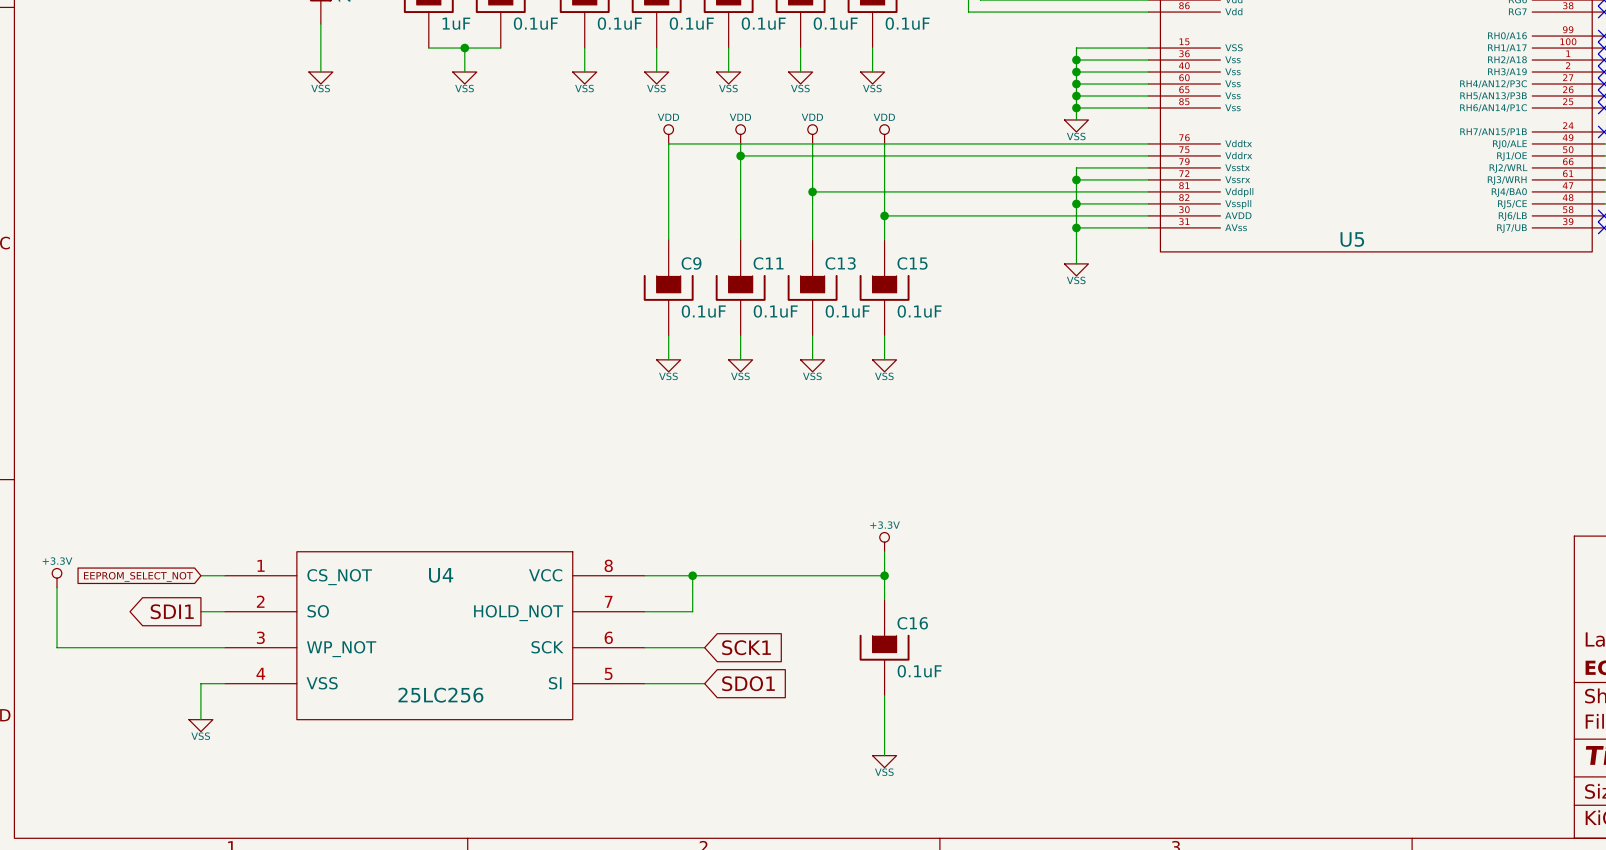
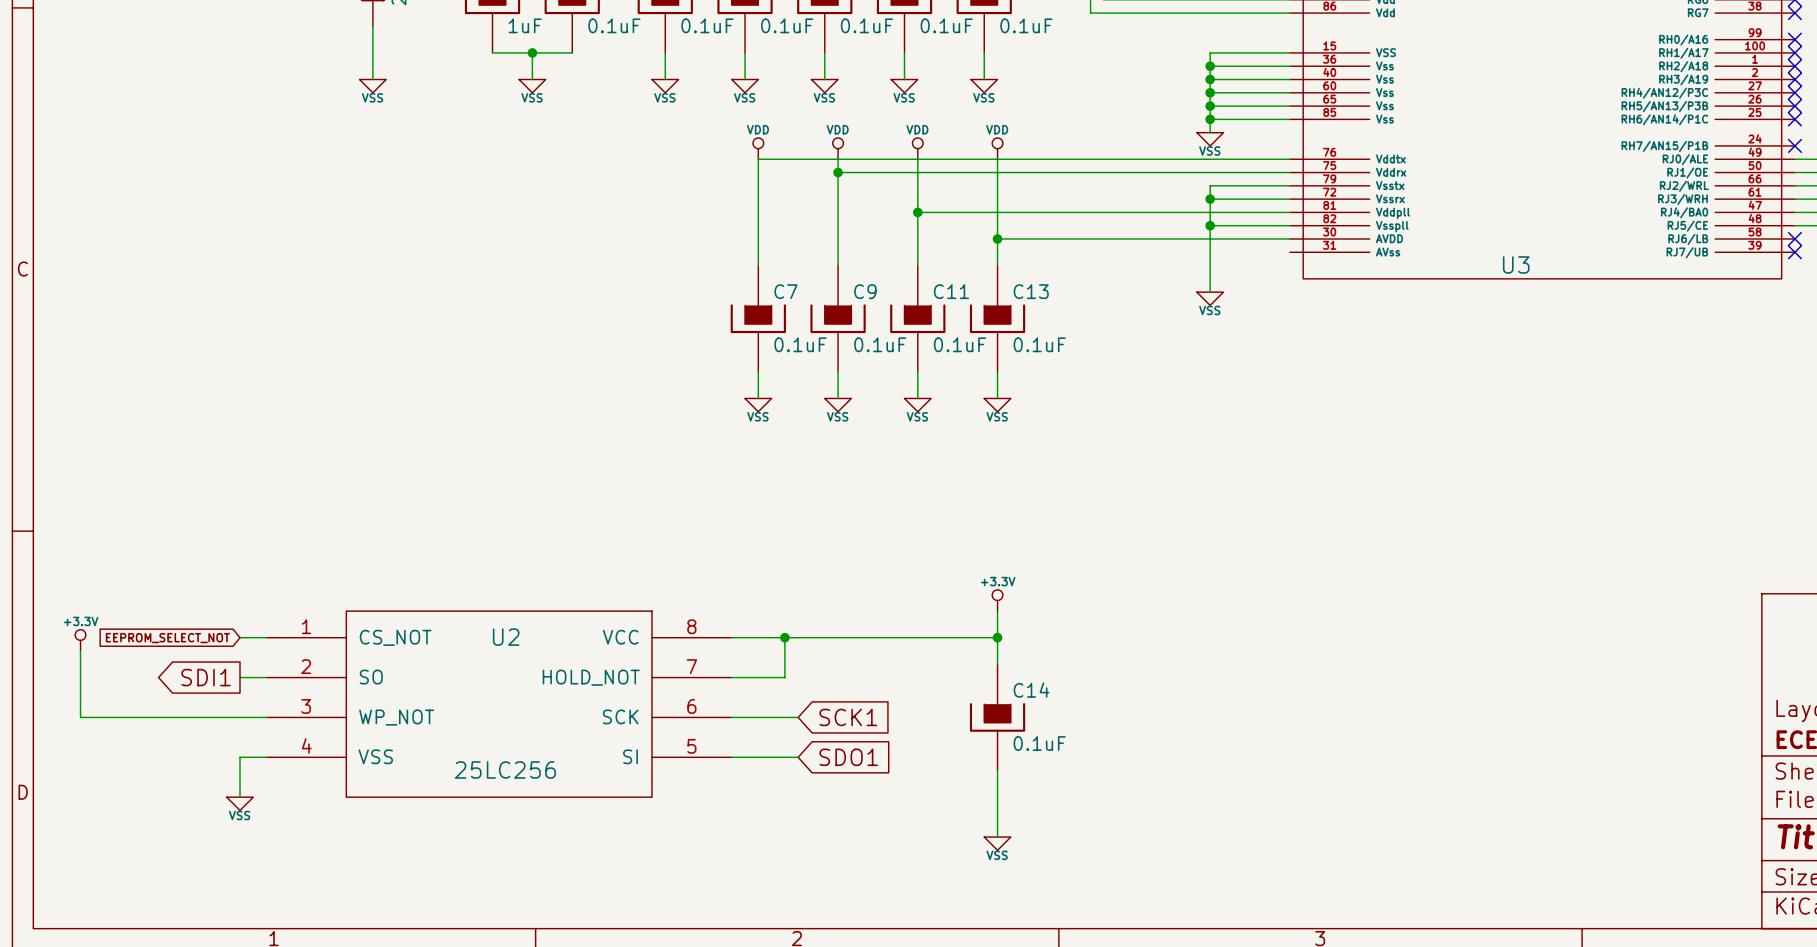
wire: (1076, 227) (1148, 227) -> none
junction: (1076, 227) -> none
U5 name: U5 (1352, 239) -> U3 (1516, 264)
C9 name: C9 (691, 263) -> C7 (785, 291)
C11 name: C11 (768, 263) -> C9 (865, 291)
C13 name: C13 (840, 263) -> C11 (951, 291)
C15 name: C15 (912, 263) -> C13 (1031, 291)
U4 name: U4 (441, 575) -> U2 (506, 637)
C16 name: C16 (912, 623) -> C14 (1031, 690)

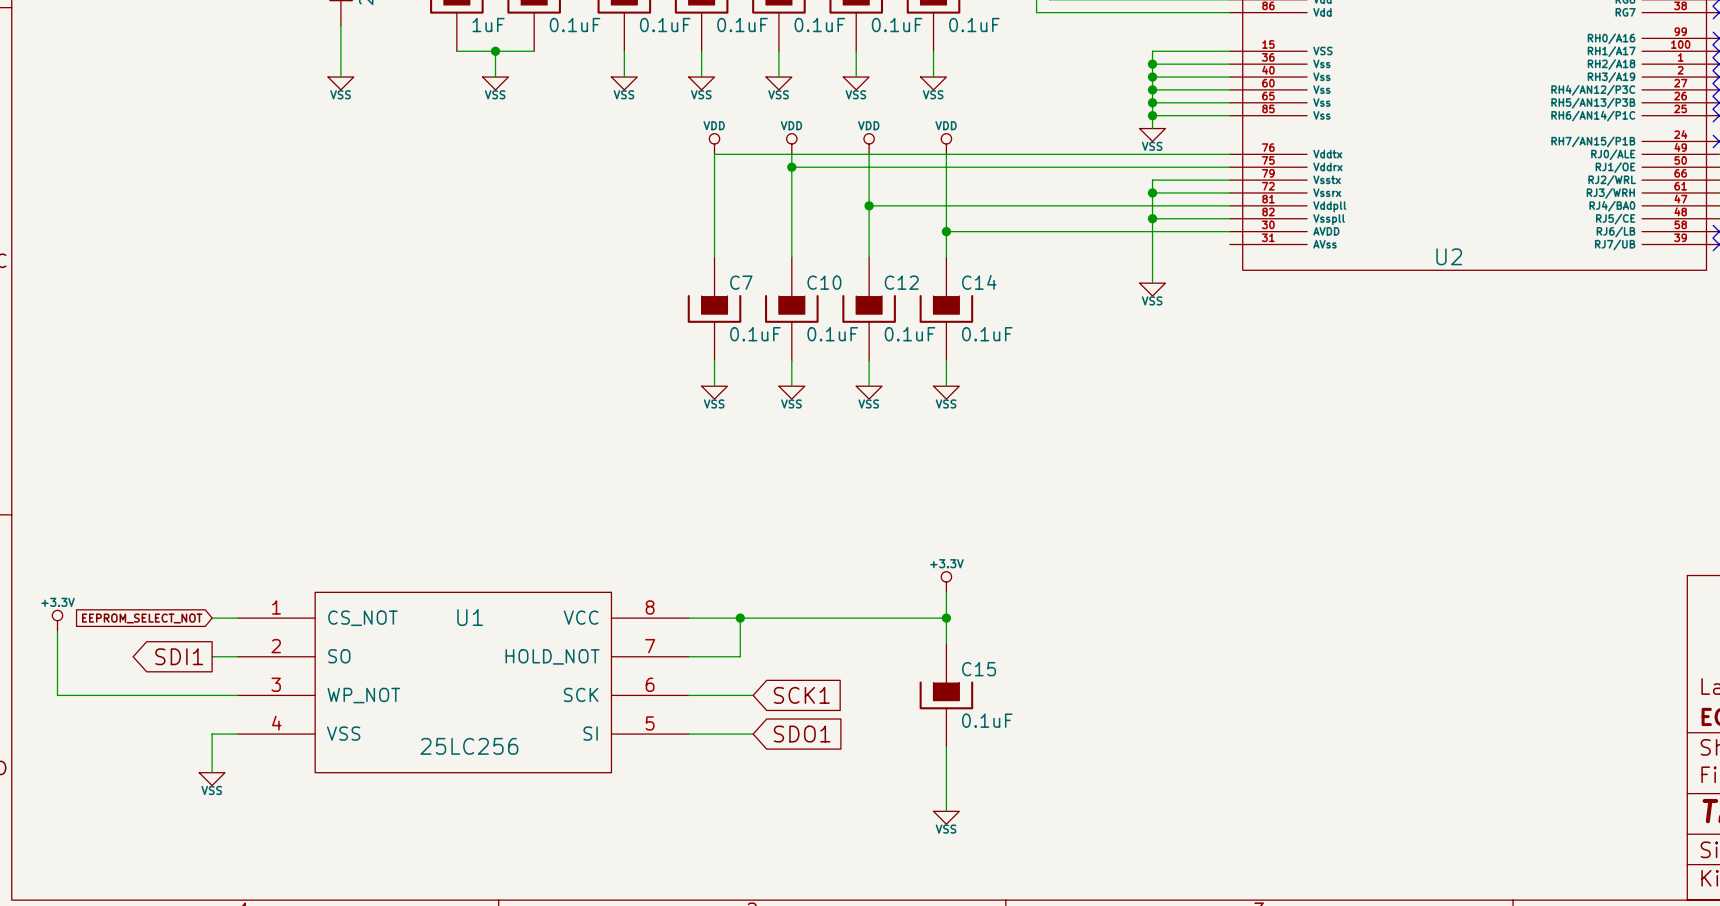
U3 name: U3 (1516, 264) -> U2 (1449, 256)
C9 name: C9 (865, 291) -> C10 (824, 282)
C11 name: C11 (951, 291) -> C12 (901, 282)
C13 name: C13 (1031, 291) -> C14 (979, 282)
U2 name: U2 (506, 637) -> U1 (470, 617)
C14 name: C14 (1031, 690) -> C15 (979, 669)

